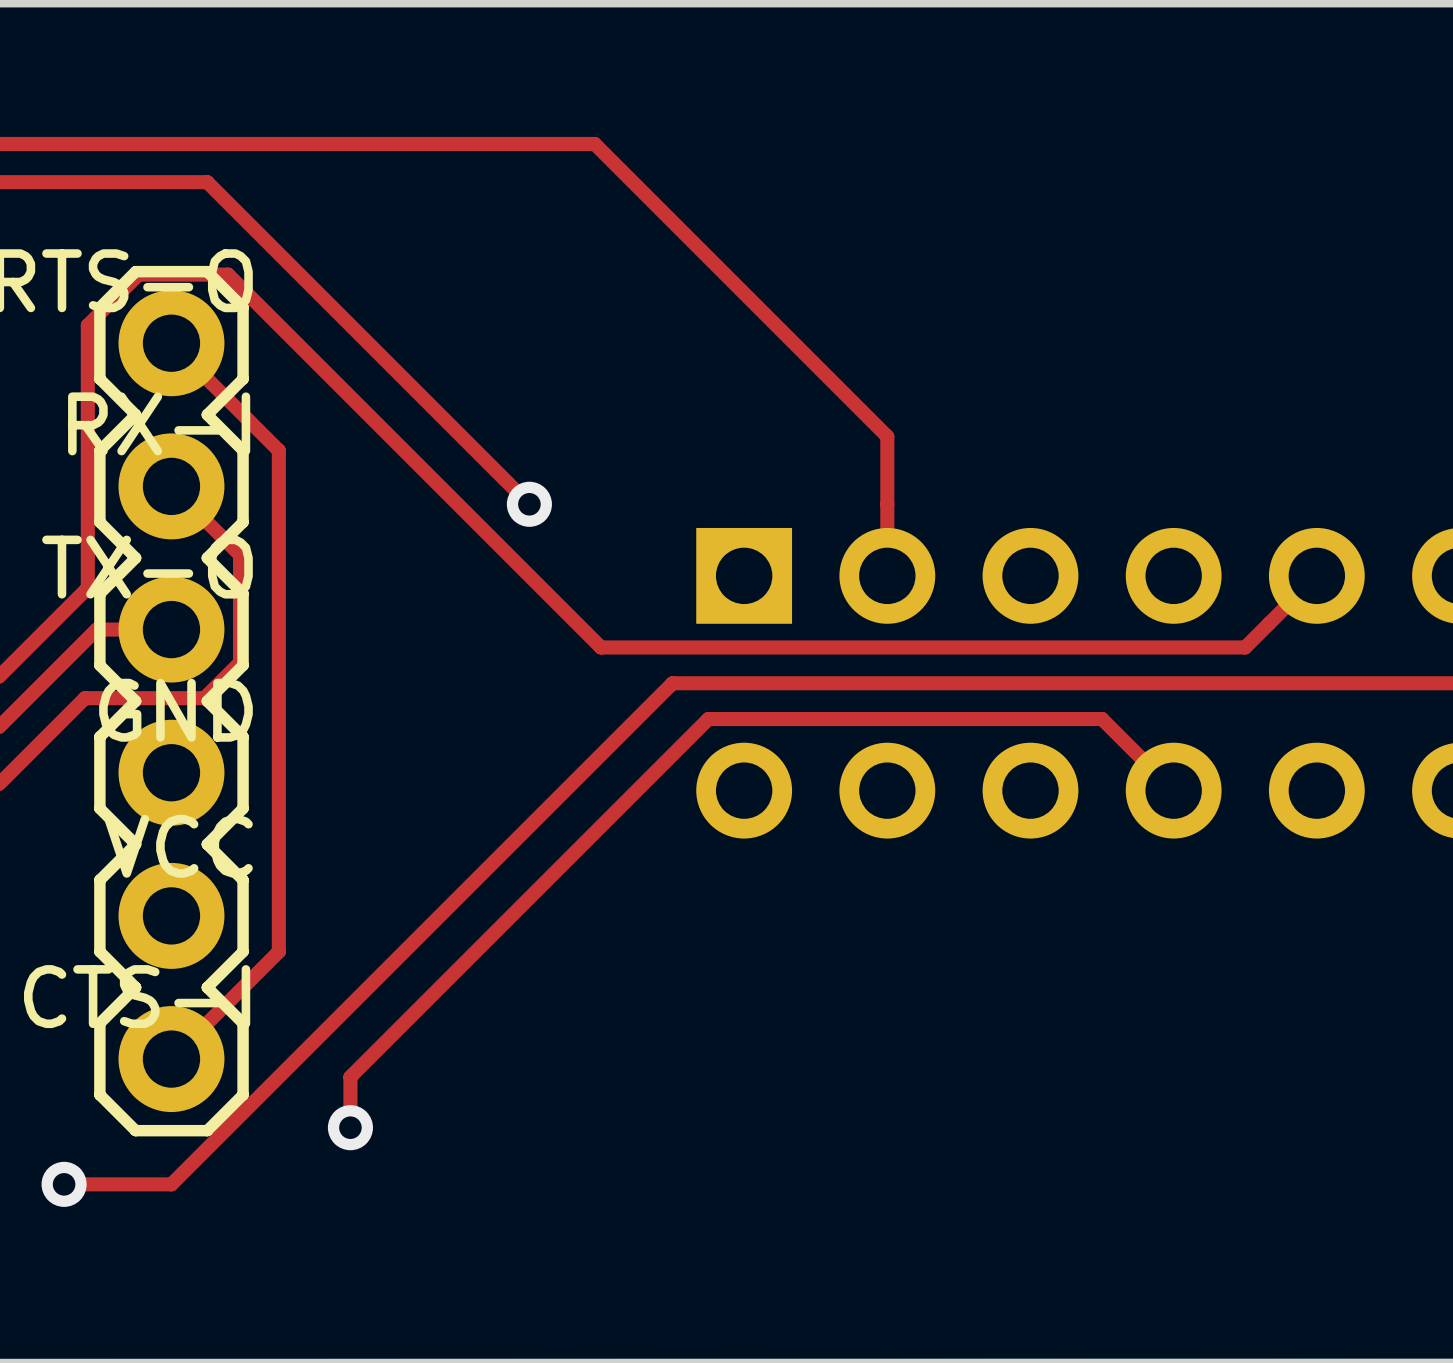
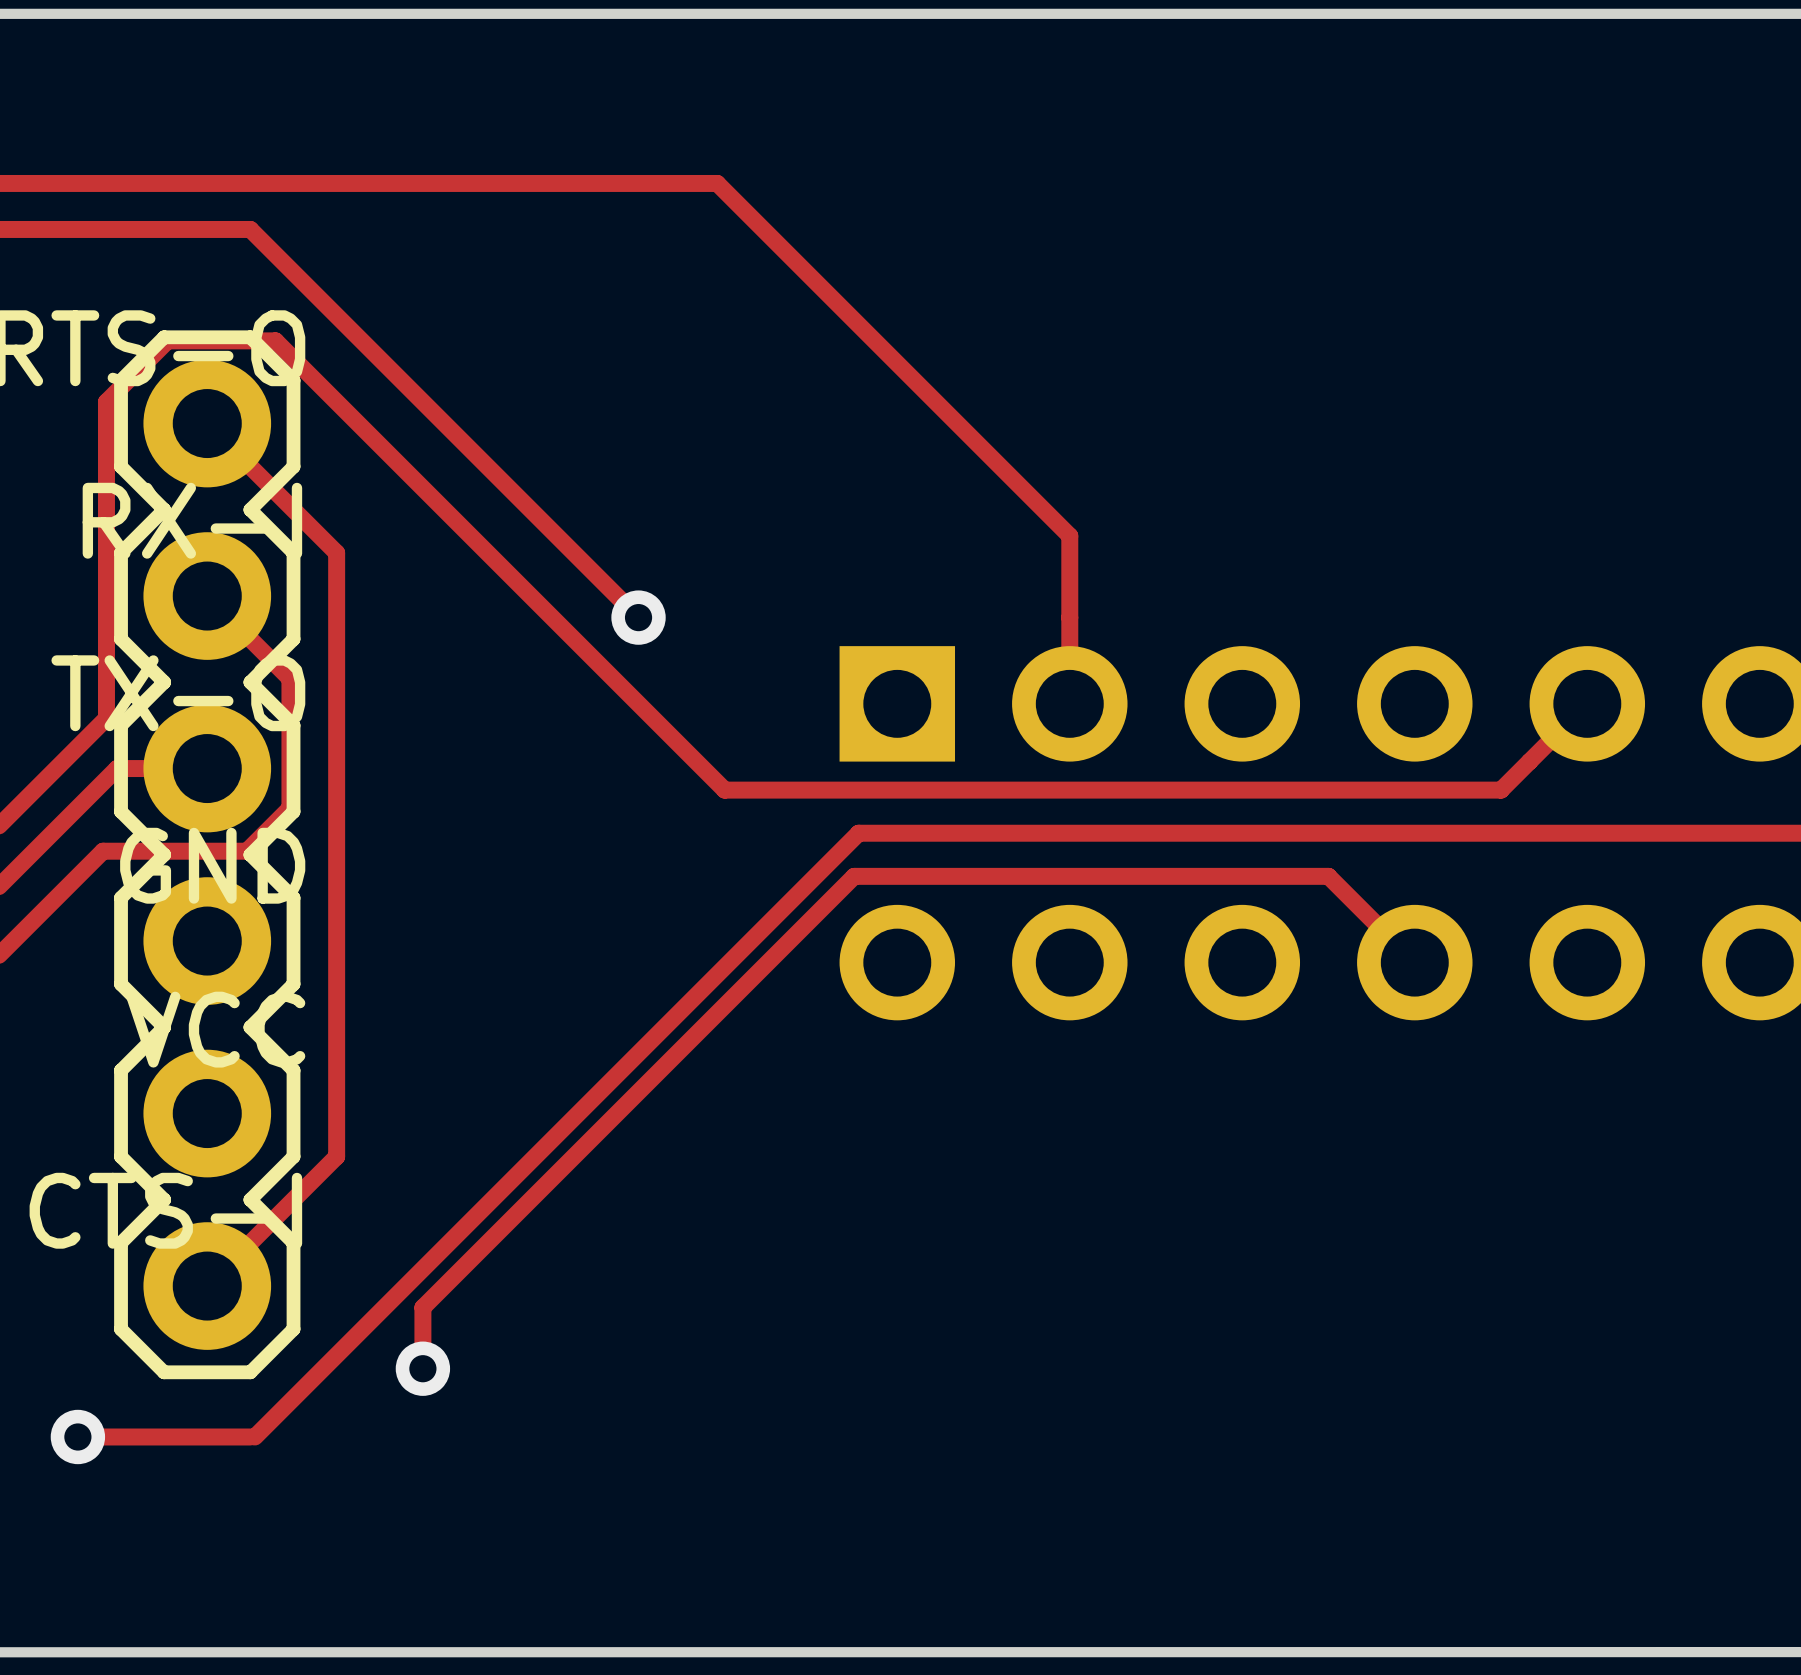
track: (712, 683) (672, 683) (171, 1184) -> (858, 833) (254, 1436)
track: none -> (207, 1436) (250, 1436)

